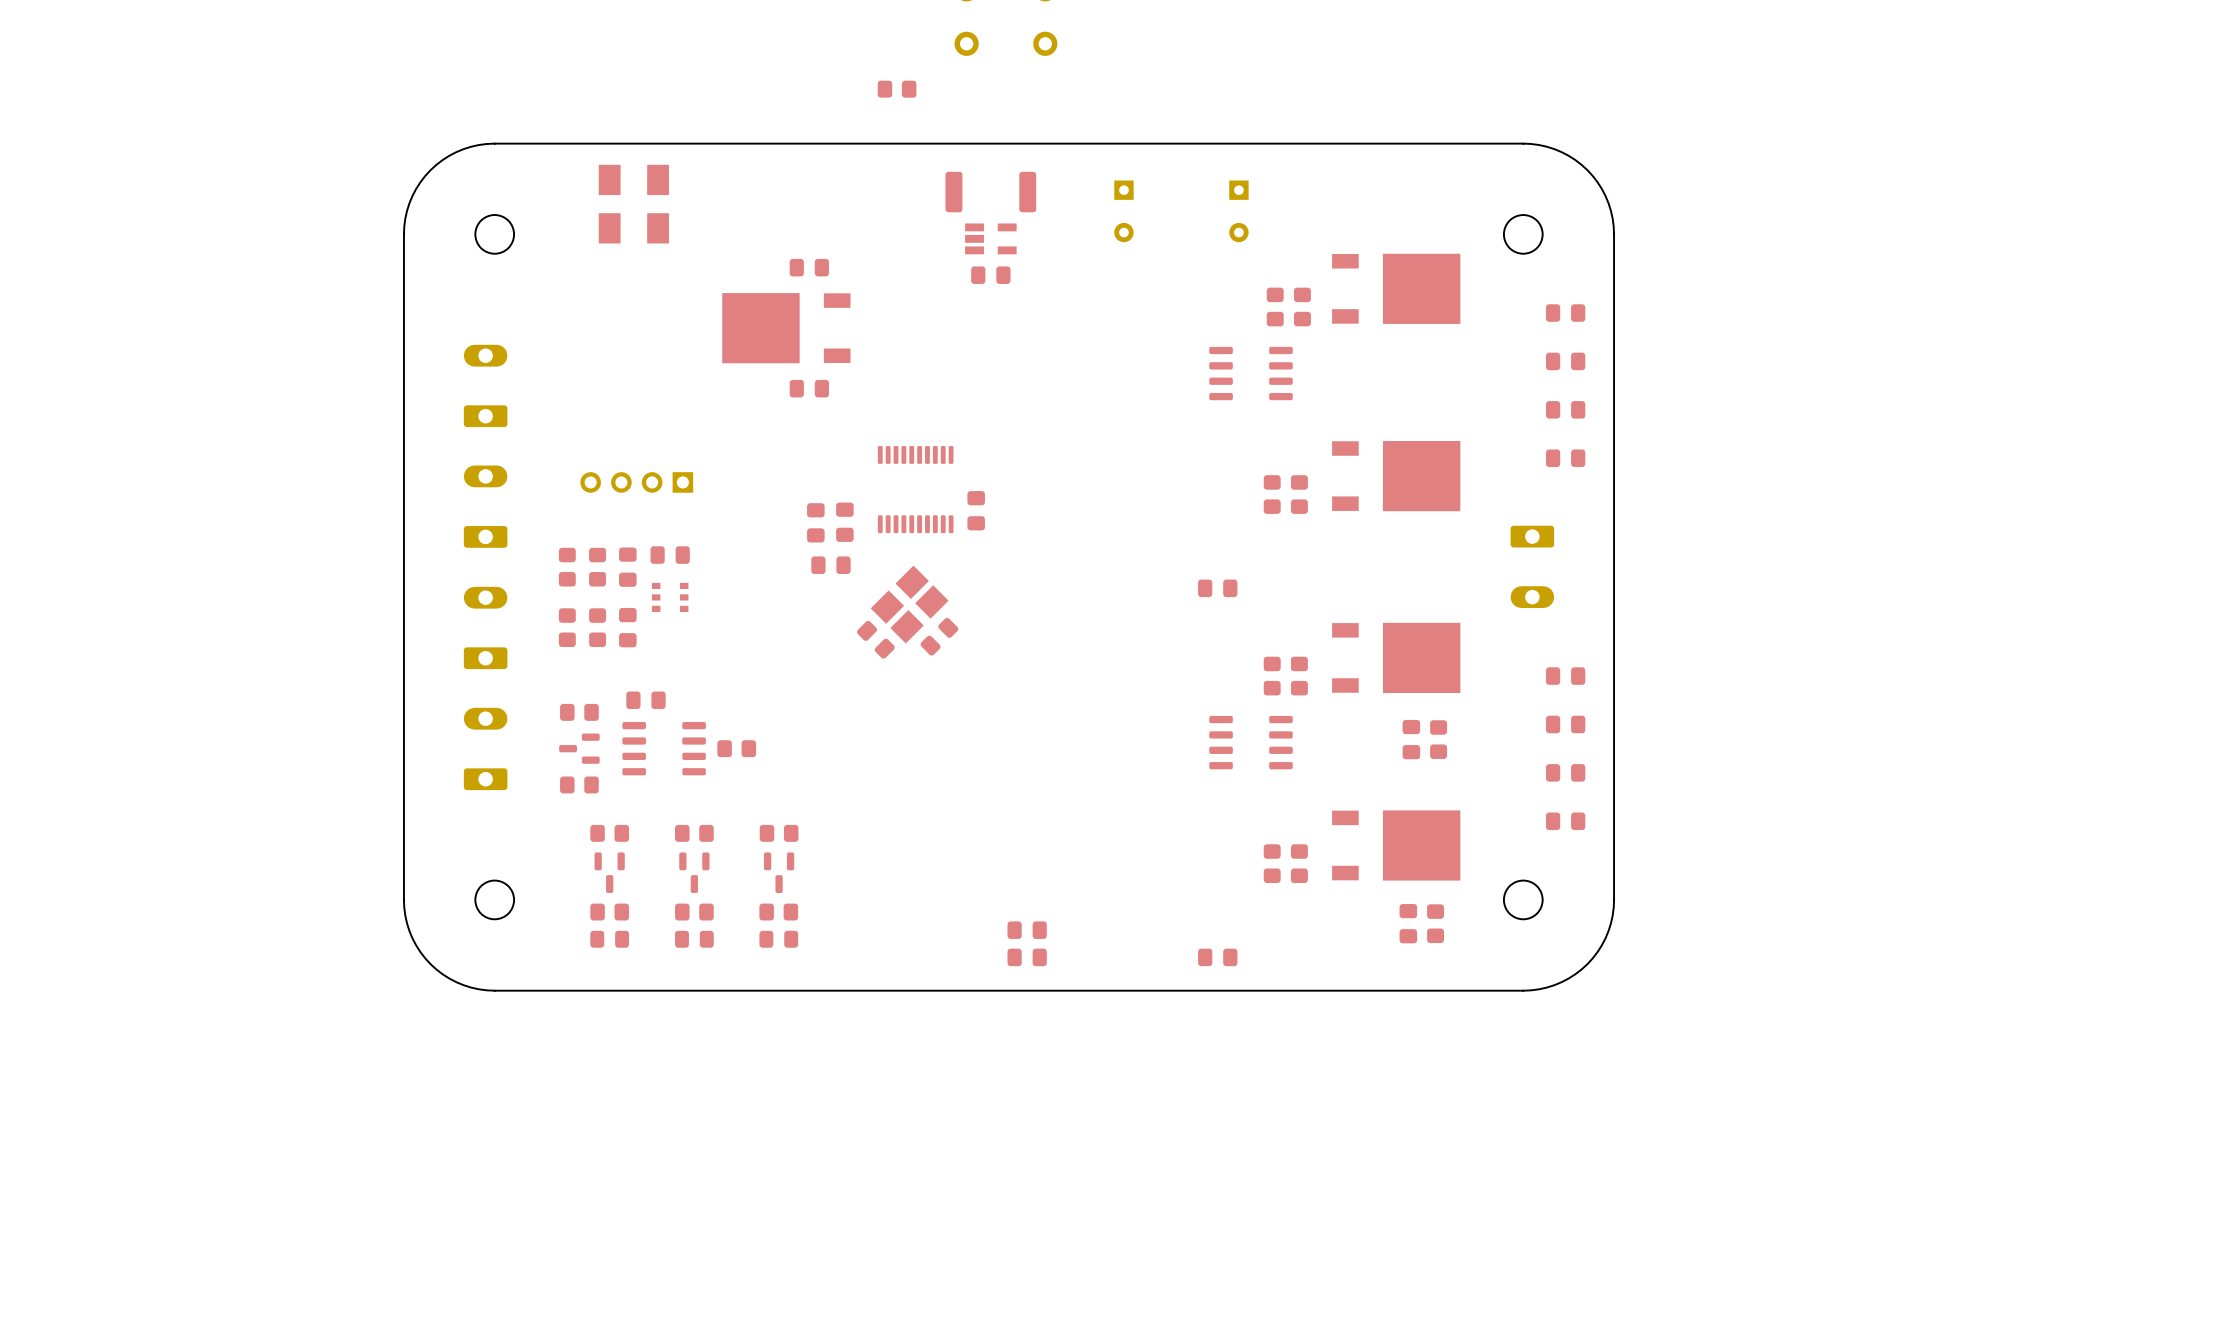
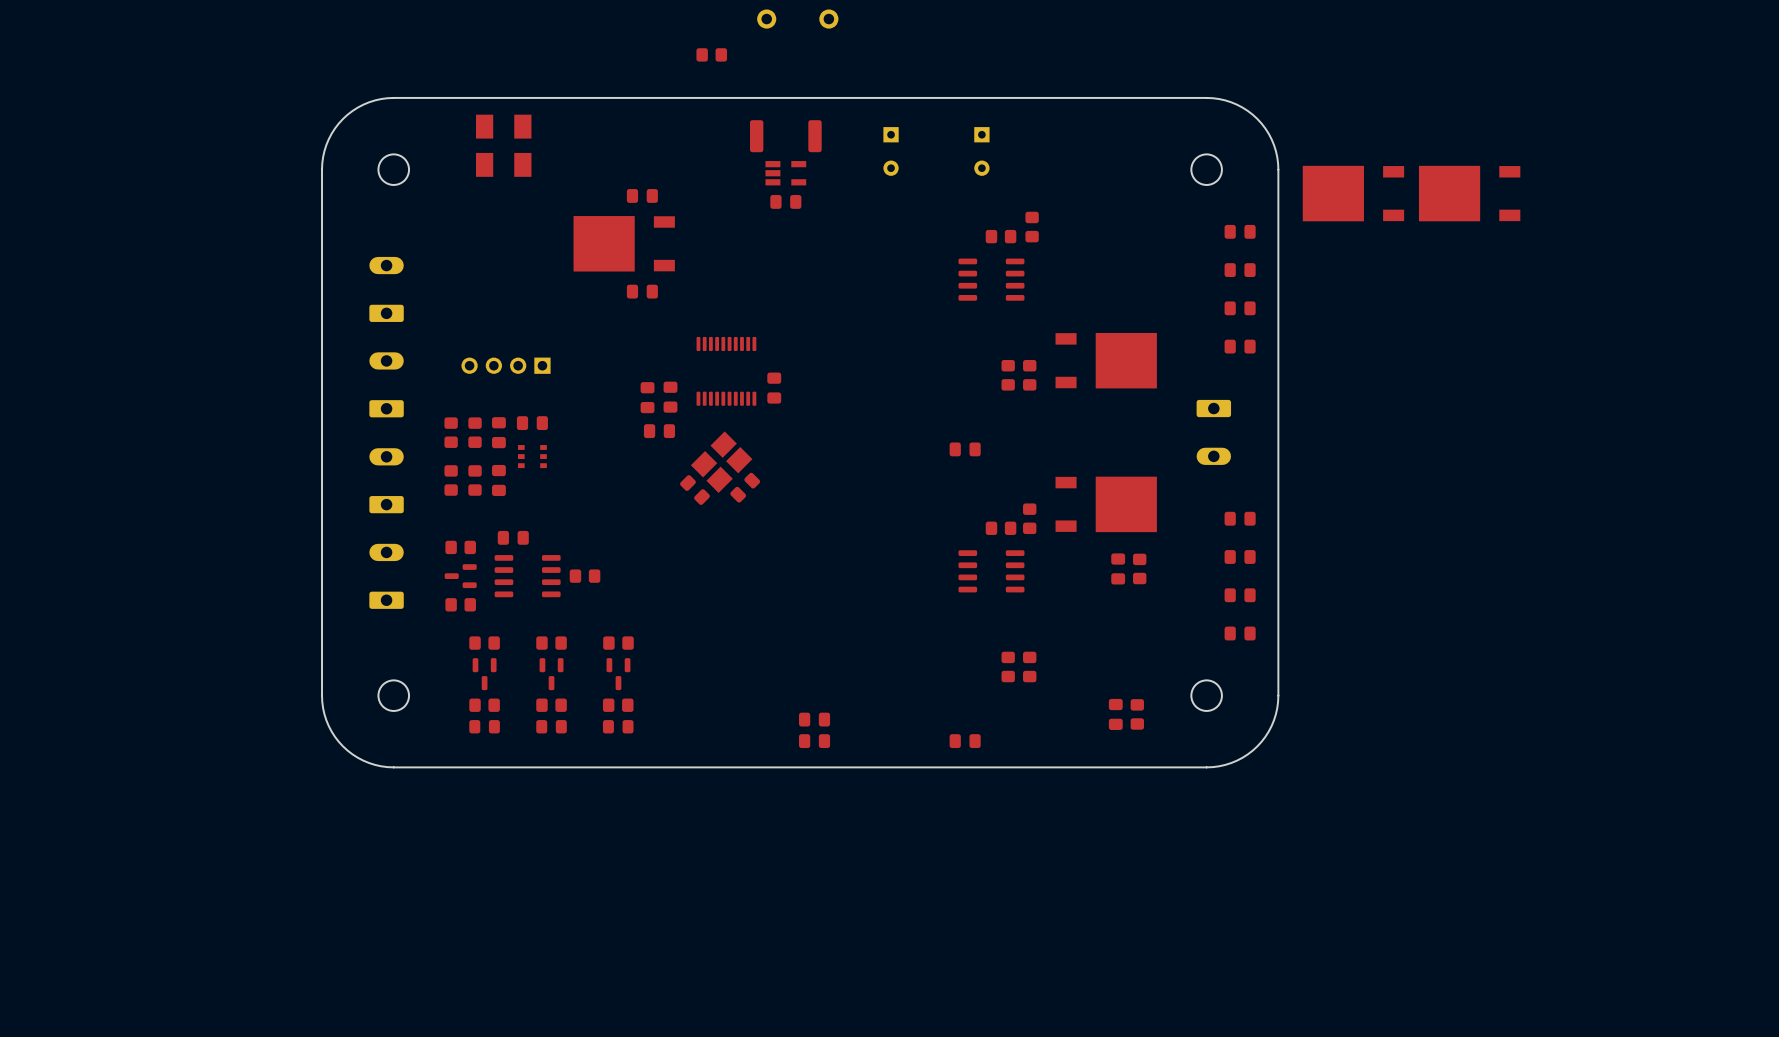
part: none -> (1353, 193)
part: none -> (1469, 193)
part: (1396, 288) -> none
part rotation: 0° (1275, 306) -> 90° clockwise (1001, 236)
part rotation: 0° (1272, 676) -> 90° clockwise (1001, 528)
part: (1396, 845) -> none

